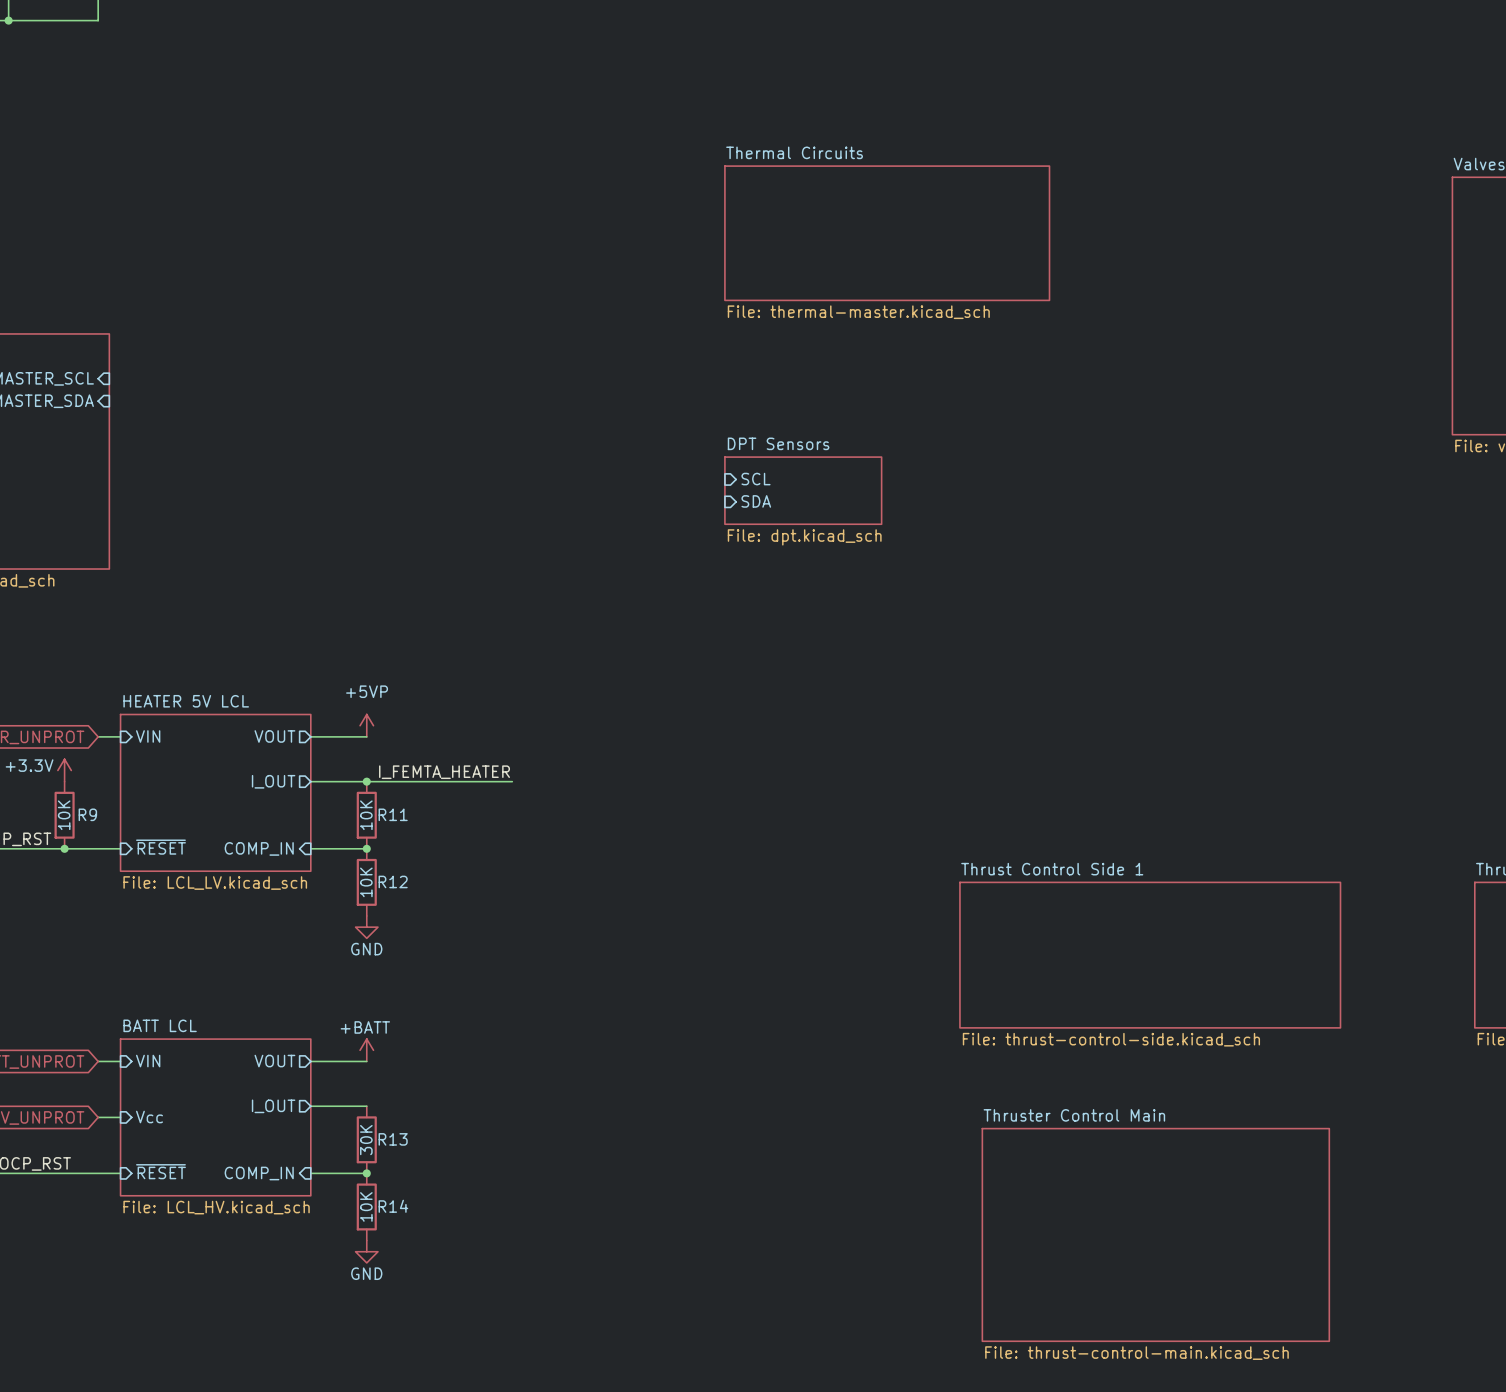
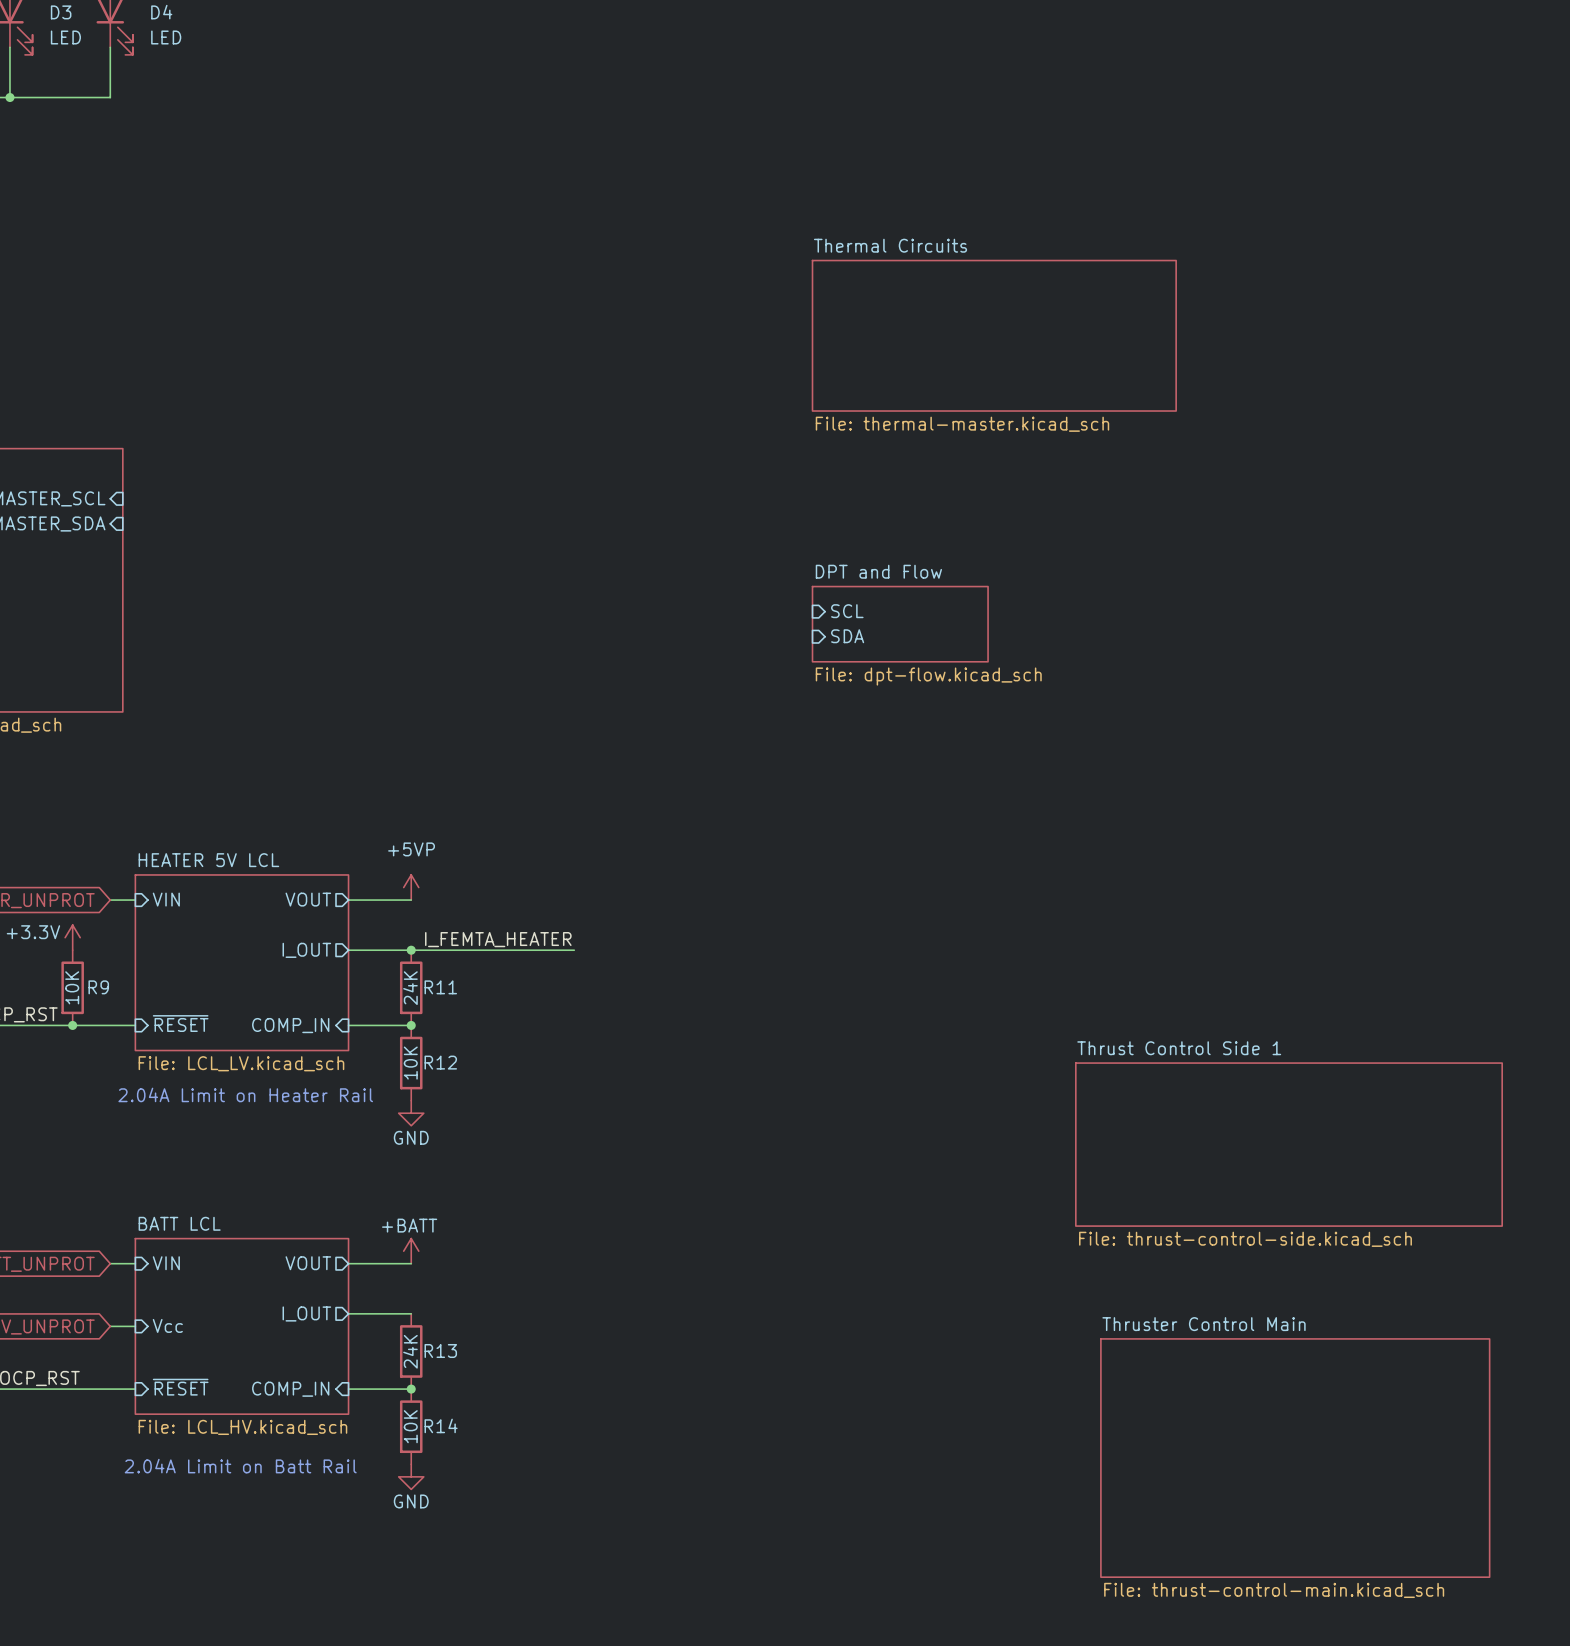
sheet DPT Sensors name: DPT Sensors (778, 443) -> DPT and Flow (878, 571)
sheet DPT Sensors value: File: dpt.kicad_sch (804, 537) -> File: dpt-flow.kicad_sch (928, 676)
R11 value: 10K (366, 815) -> 24K (410, 988)
text: none -> 2.04A Limit on Heater Rail (245, 1094)
R13 value: 30K (366, 1140) -> 24K (410, 1351)
text: none -> 2.04A Limit on Batt Rail (240, 1466)

